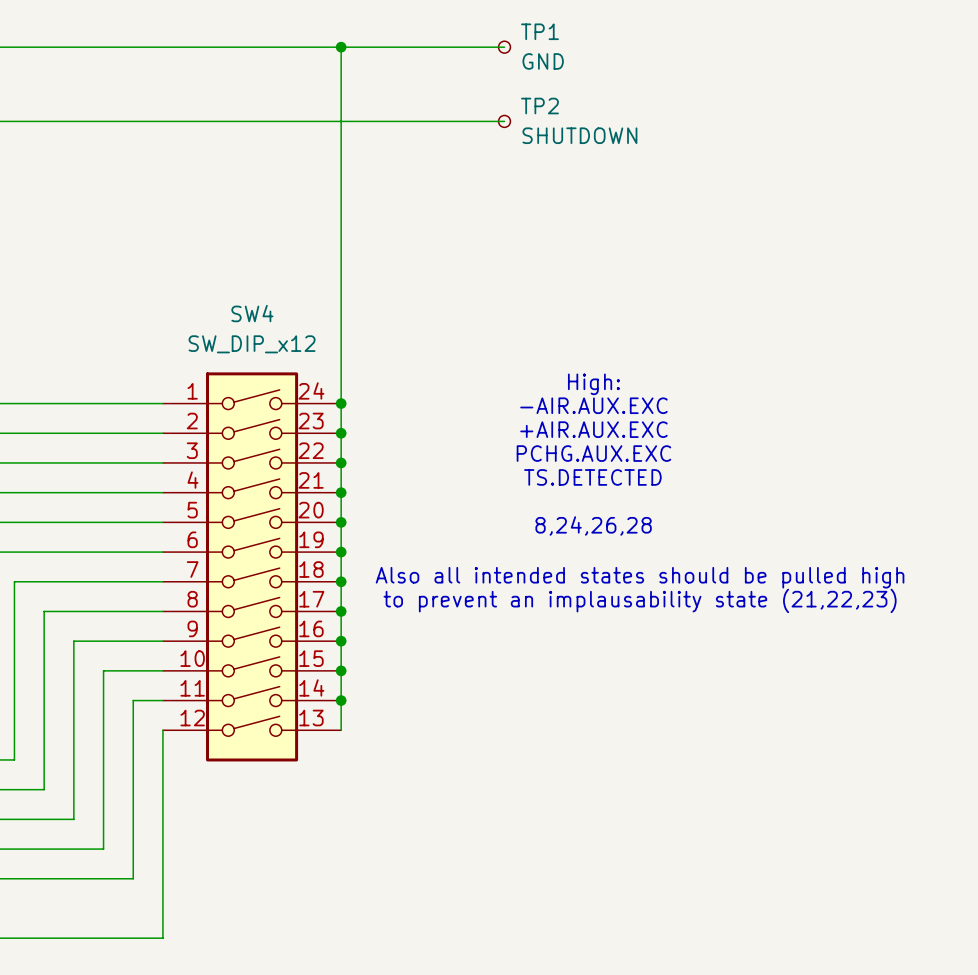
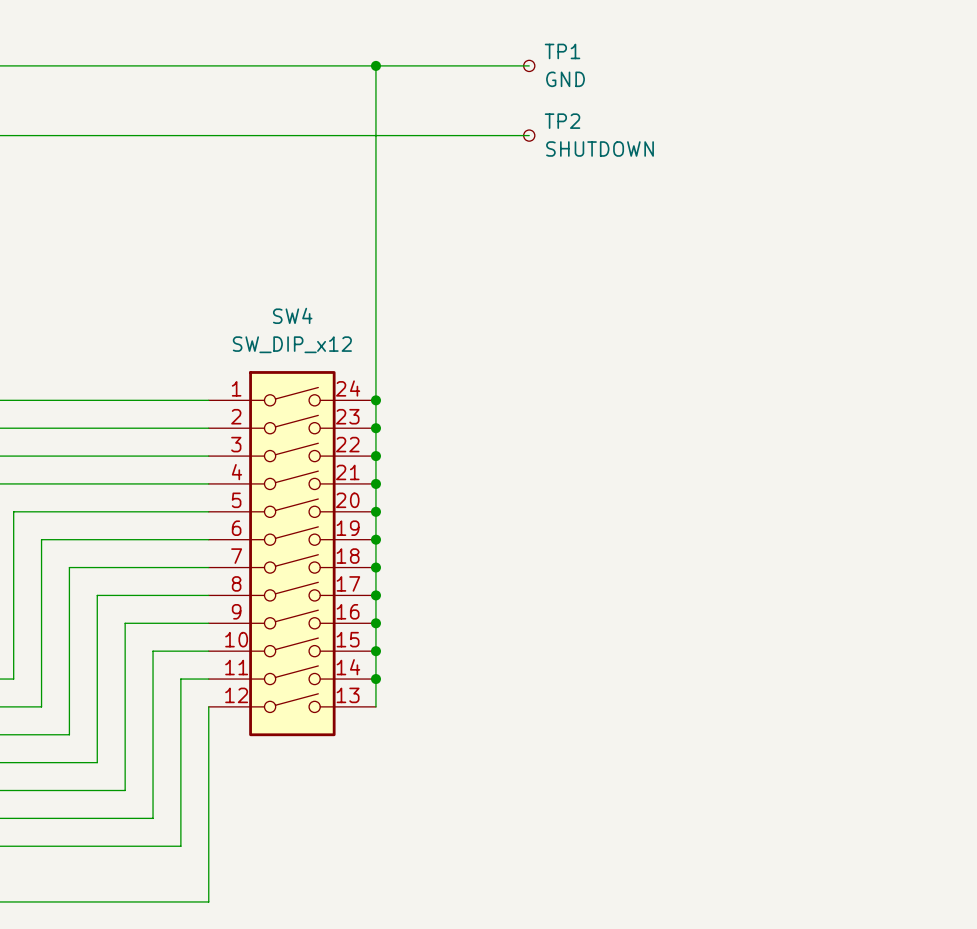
text: High: (593, 384) -> none
text: -AIR.AUX.EXC (593, 405) -> none
text: +AIR.AUX.EXC (593, 429) -> none
text: PCHG.AUX.EXC (593, 453) -> none
text: TS.DETECTED (592, 477) -> none
text: 8,24,26,28 (593, 525) -> none
text: Also all intended states should be pulled high (640, 577) -> none
text: to prevent an implausability state (21,22,23) (640, 600) -> none

